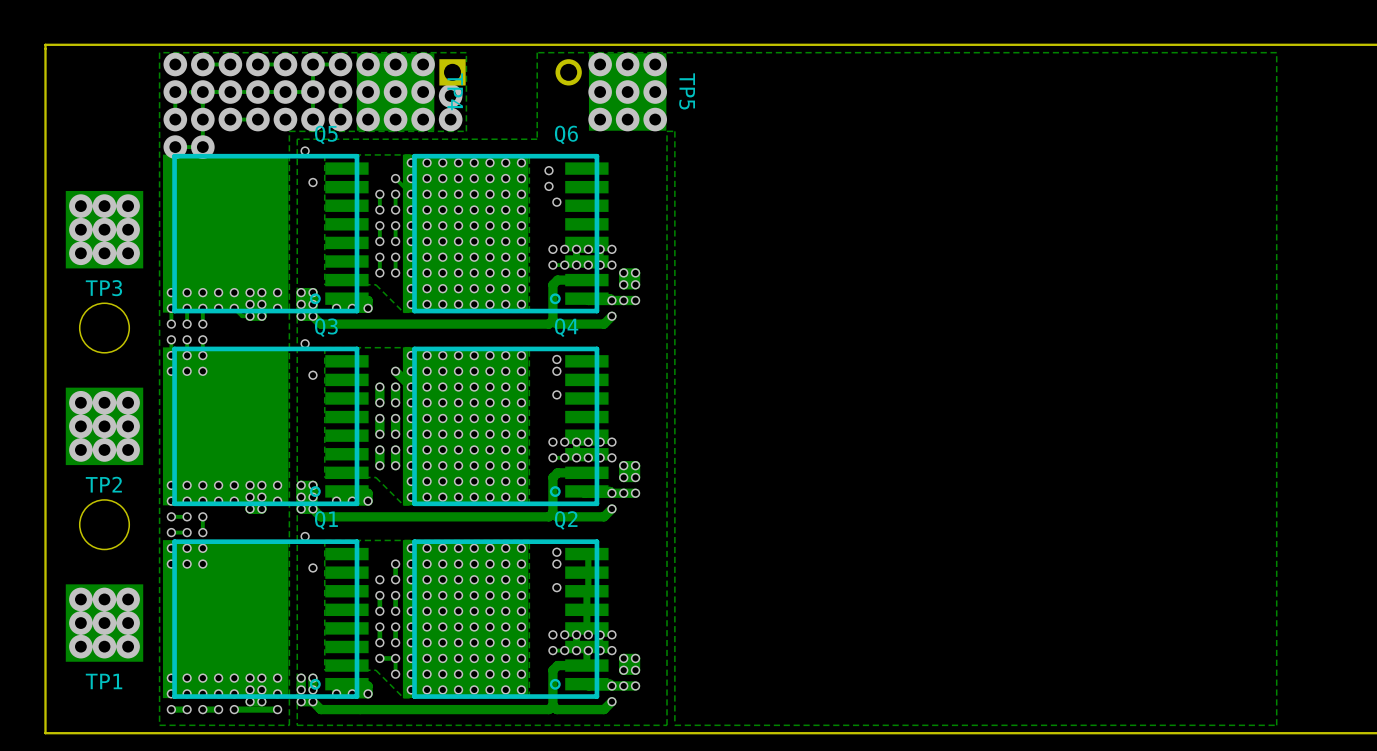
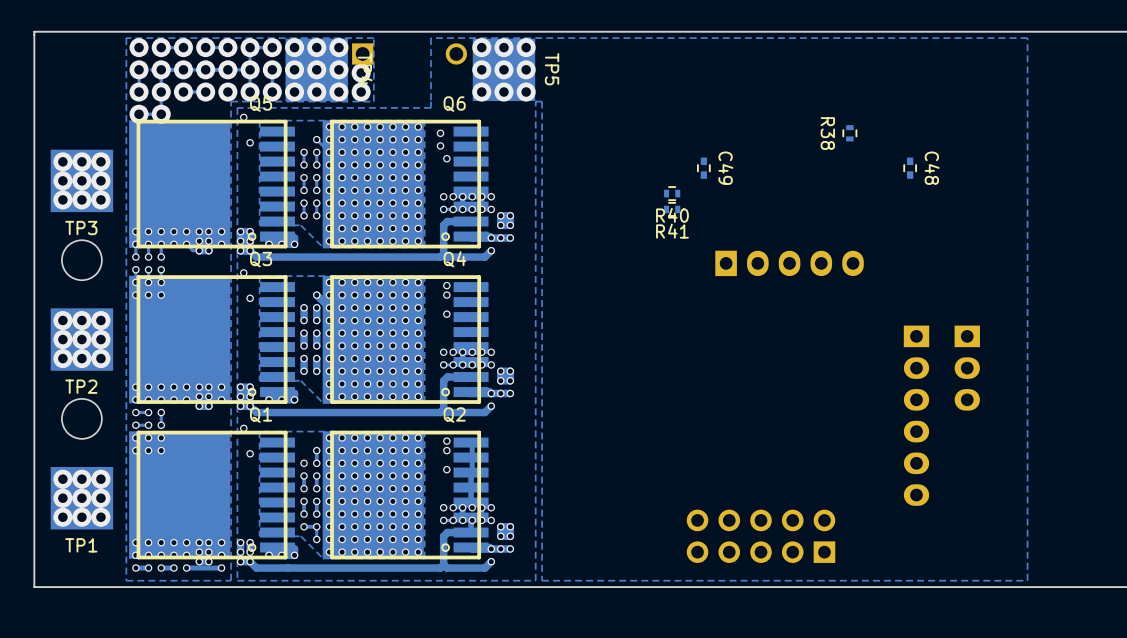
R38: none -> (849, 133)
C49: none -> (703, 168)
C48: none -> (910, 168)
R40: none -> (672, 193)
R41: none -> (672, 209)
part: none -> (789, 263)
part: none -> (967, 368)
part: none -> (916, 415)
part: none -> (761, 536)

